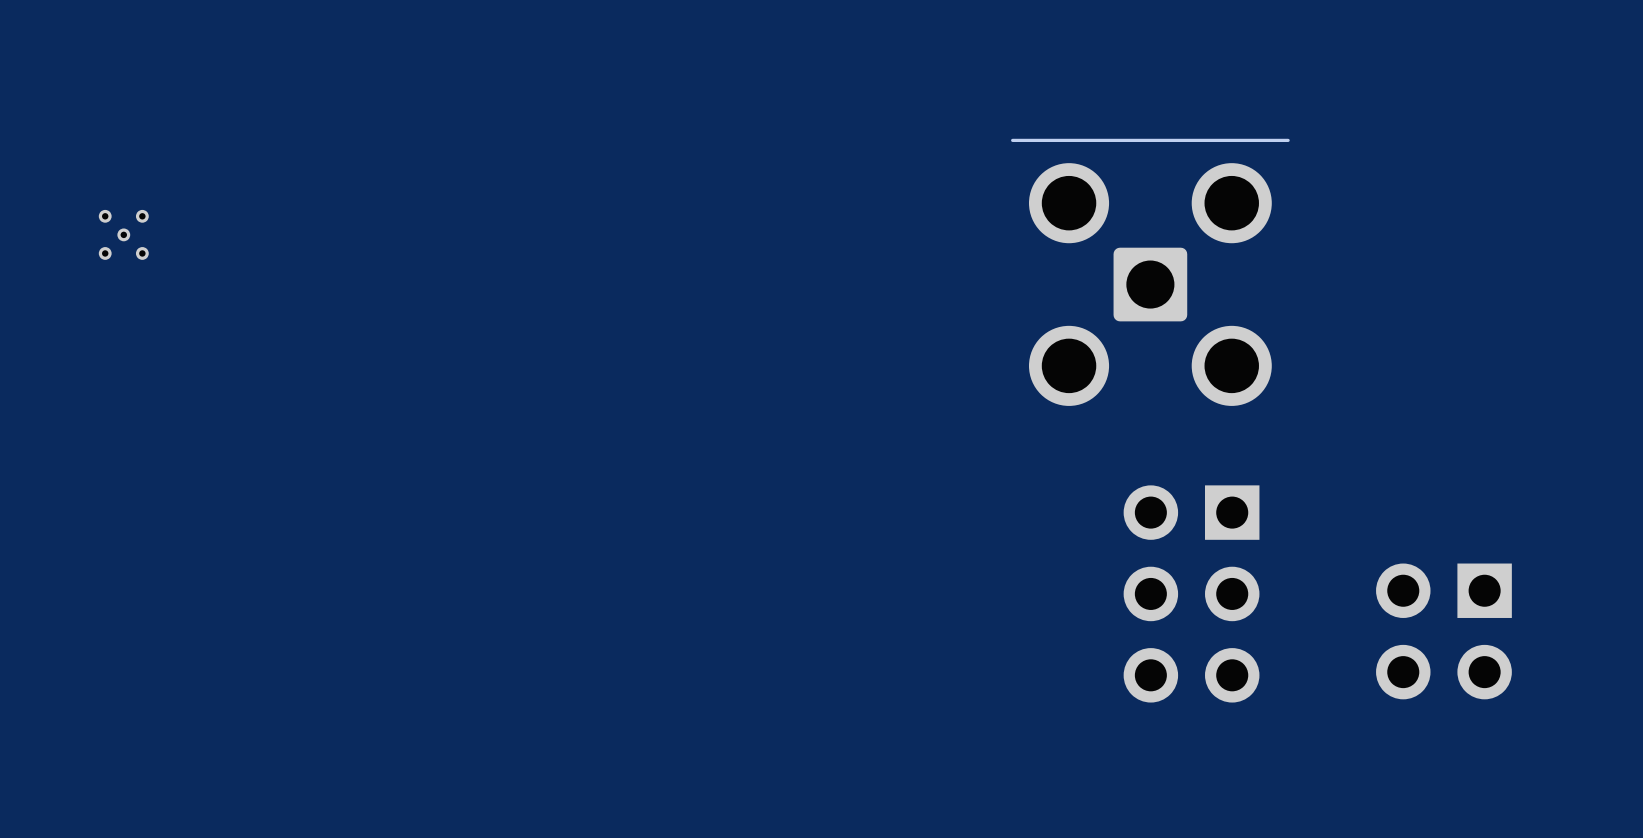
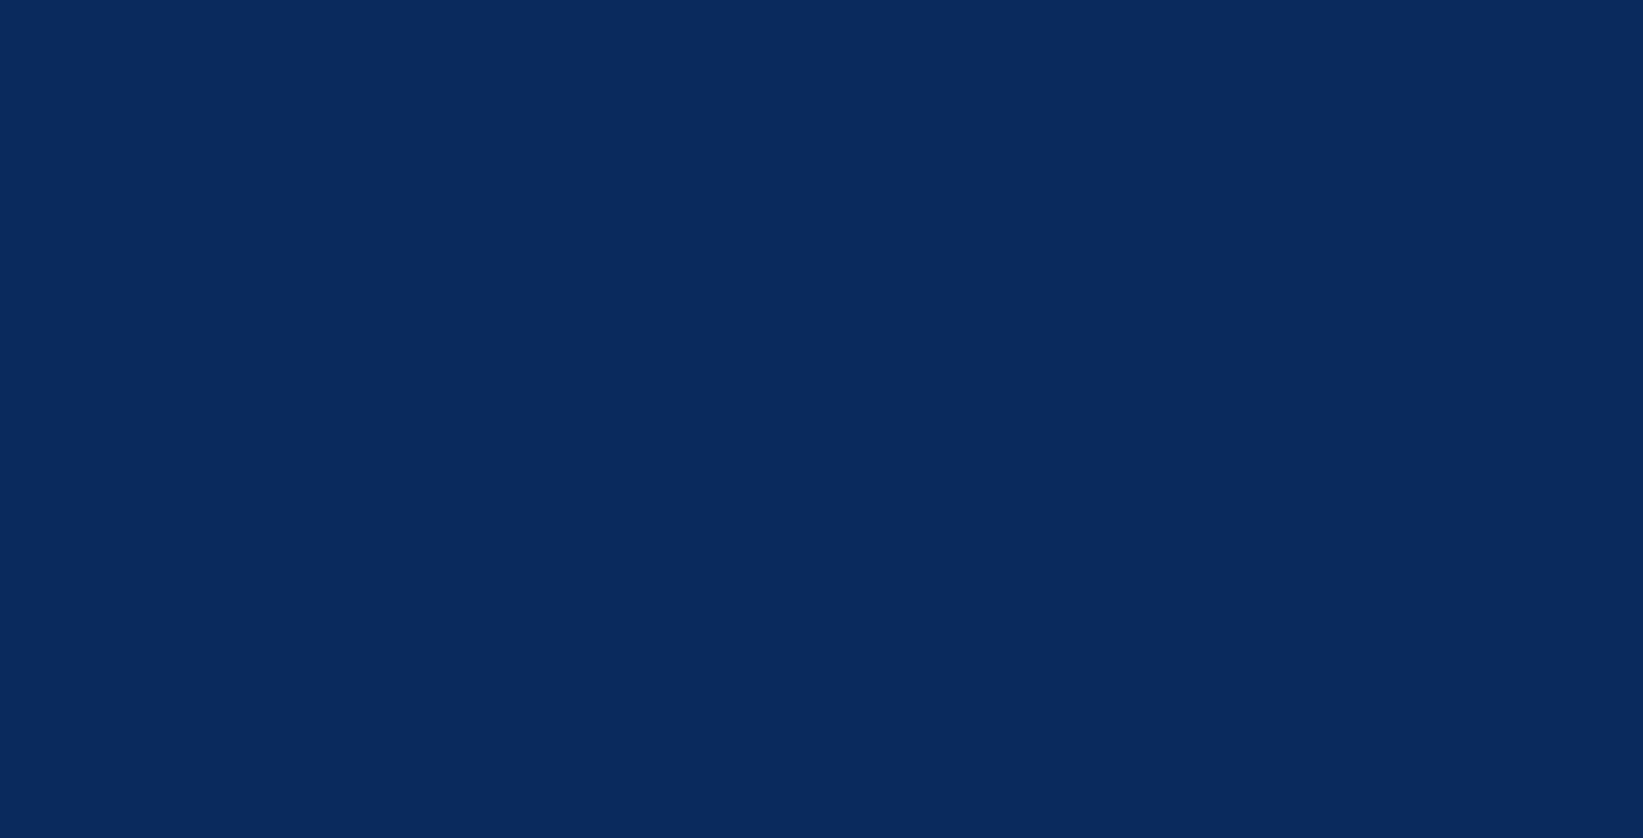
part: (123, 234) -> none
part: (1150, 272) -> none
part: (1191, 593) -> none
part: (1443, 631) -> none

